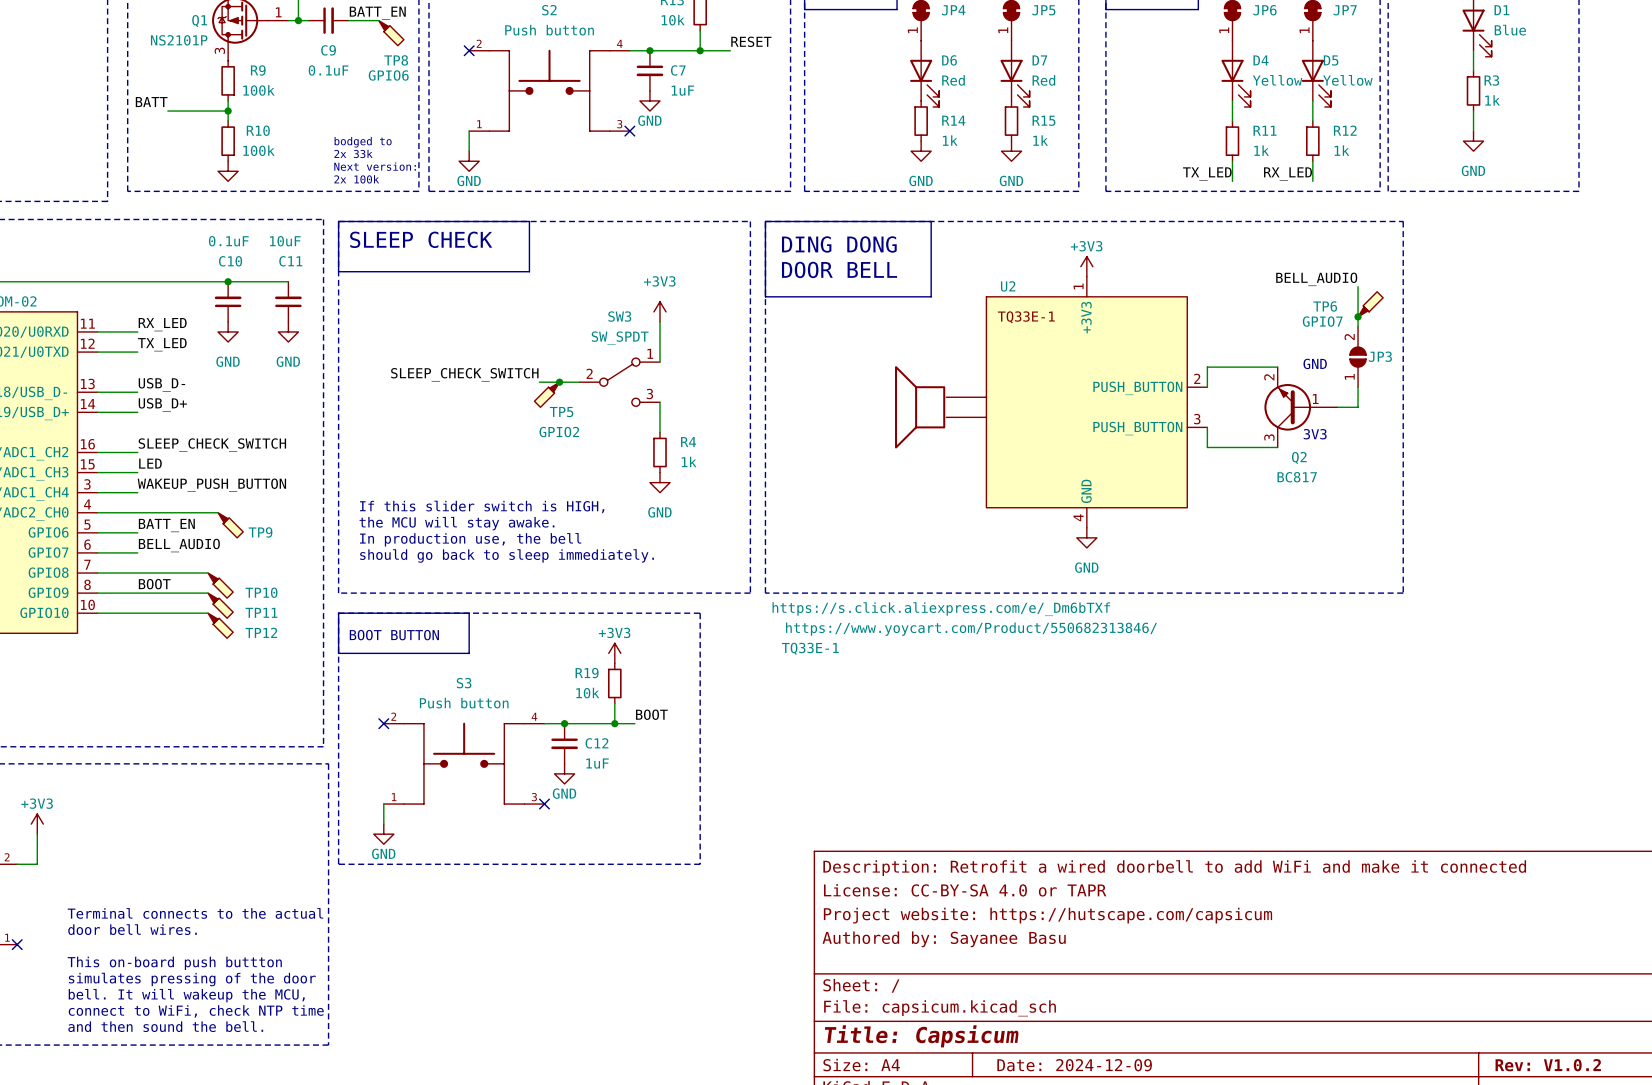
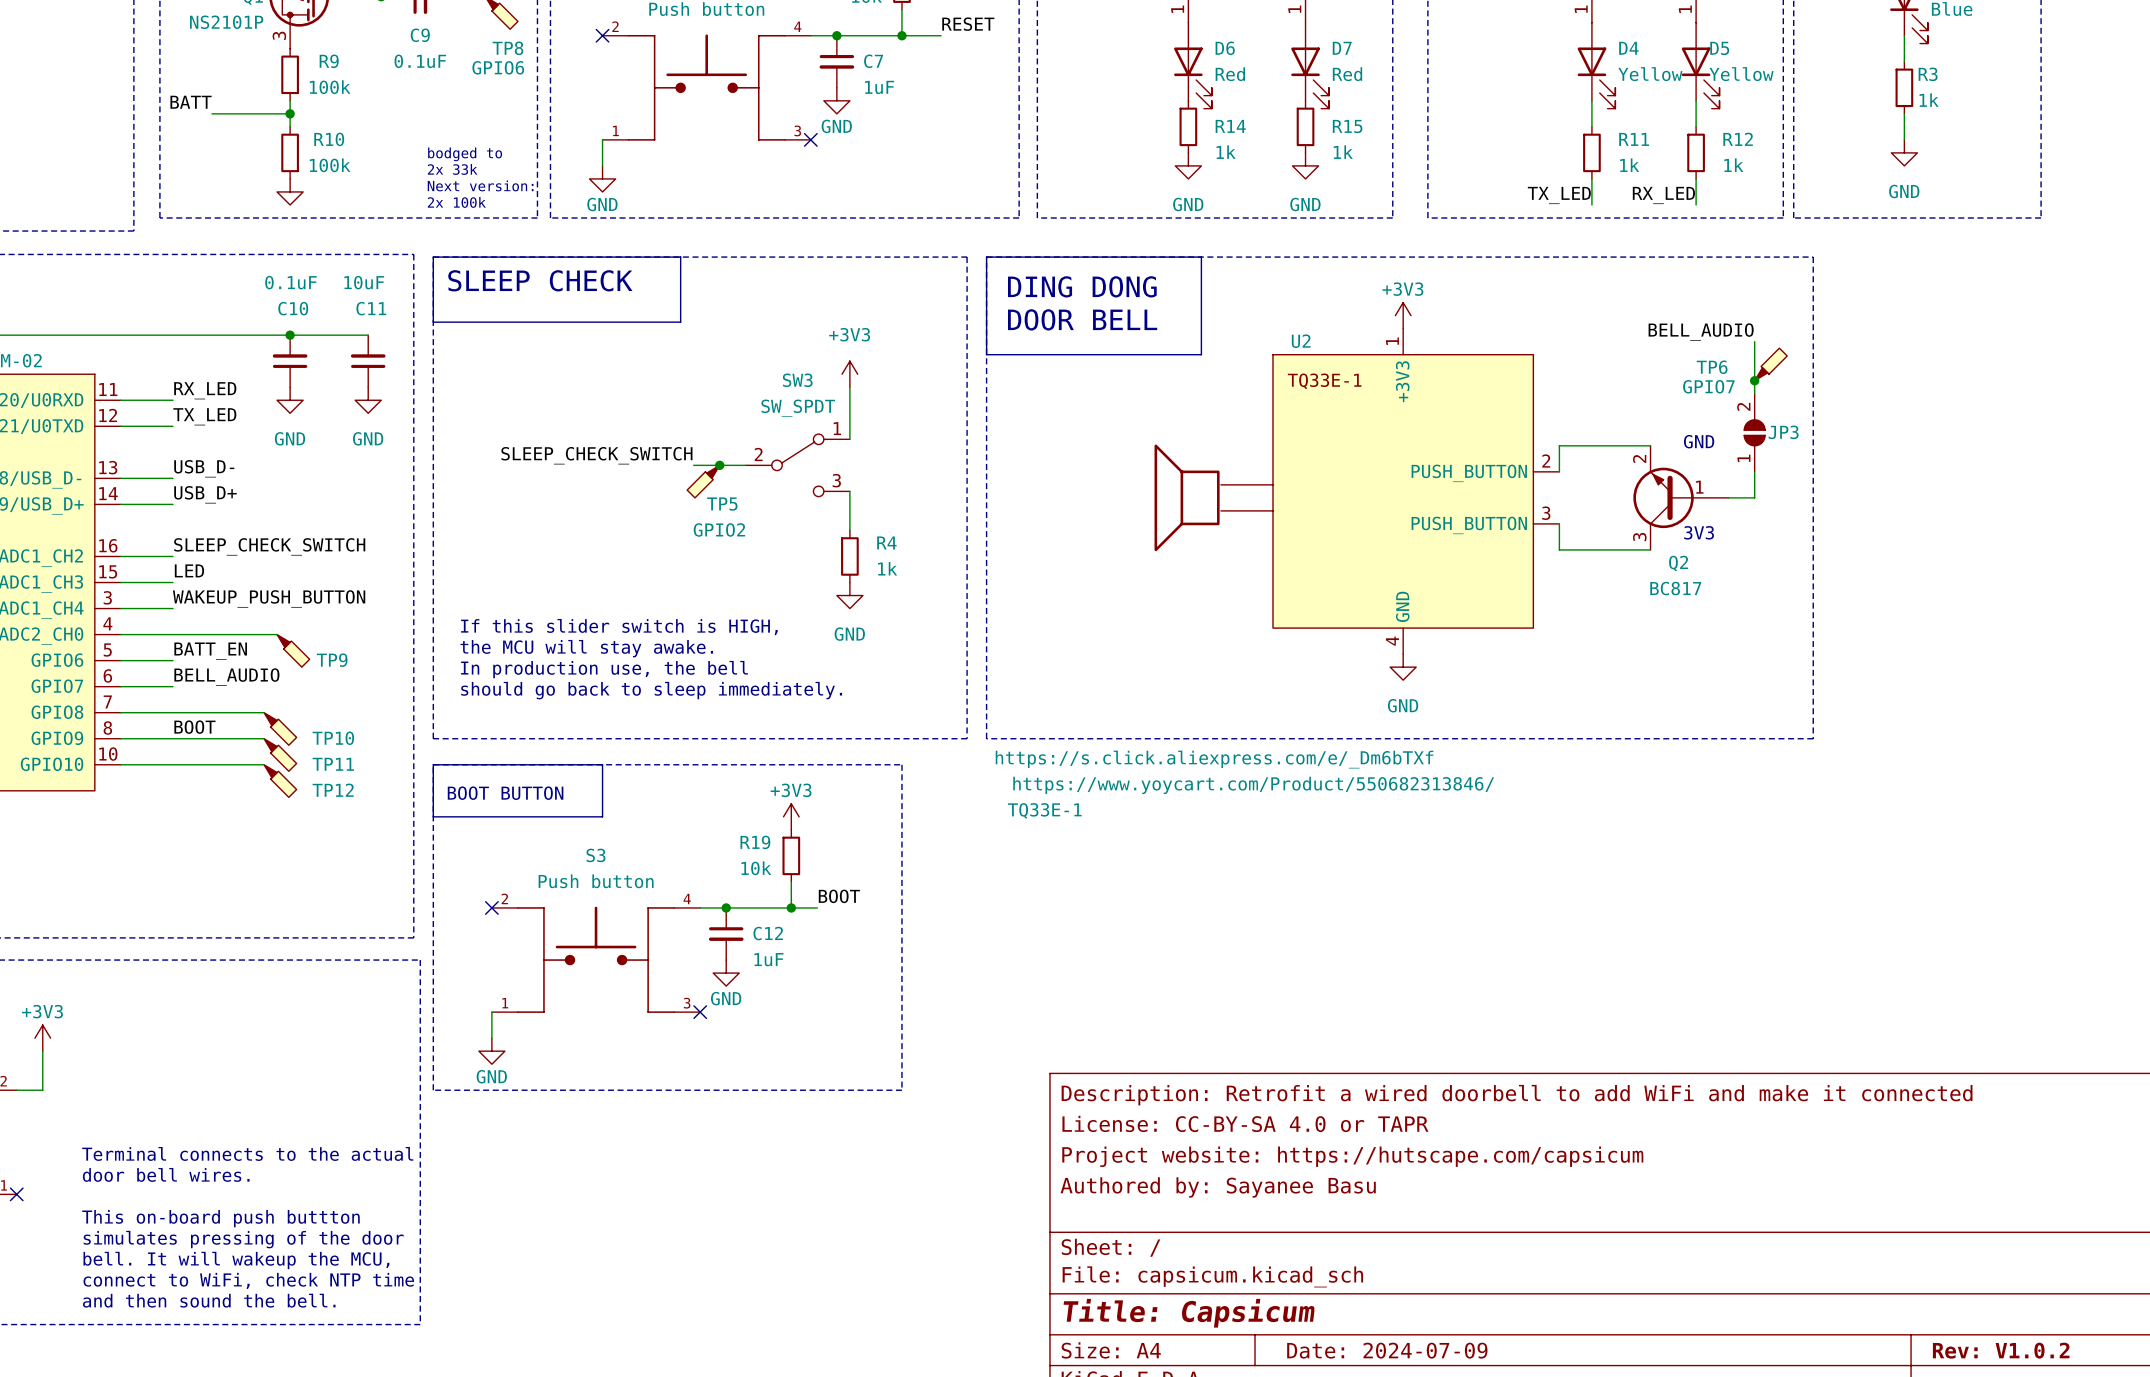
title block: Date: 2024-12-09 (1074, 1065) -> Date: 2024-07-09 (1387, 1350)

